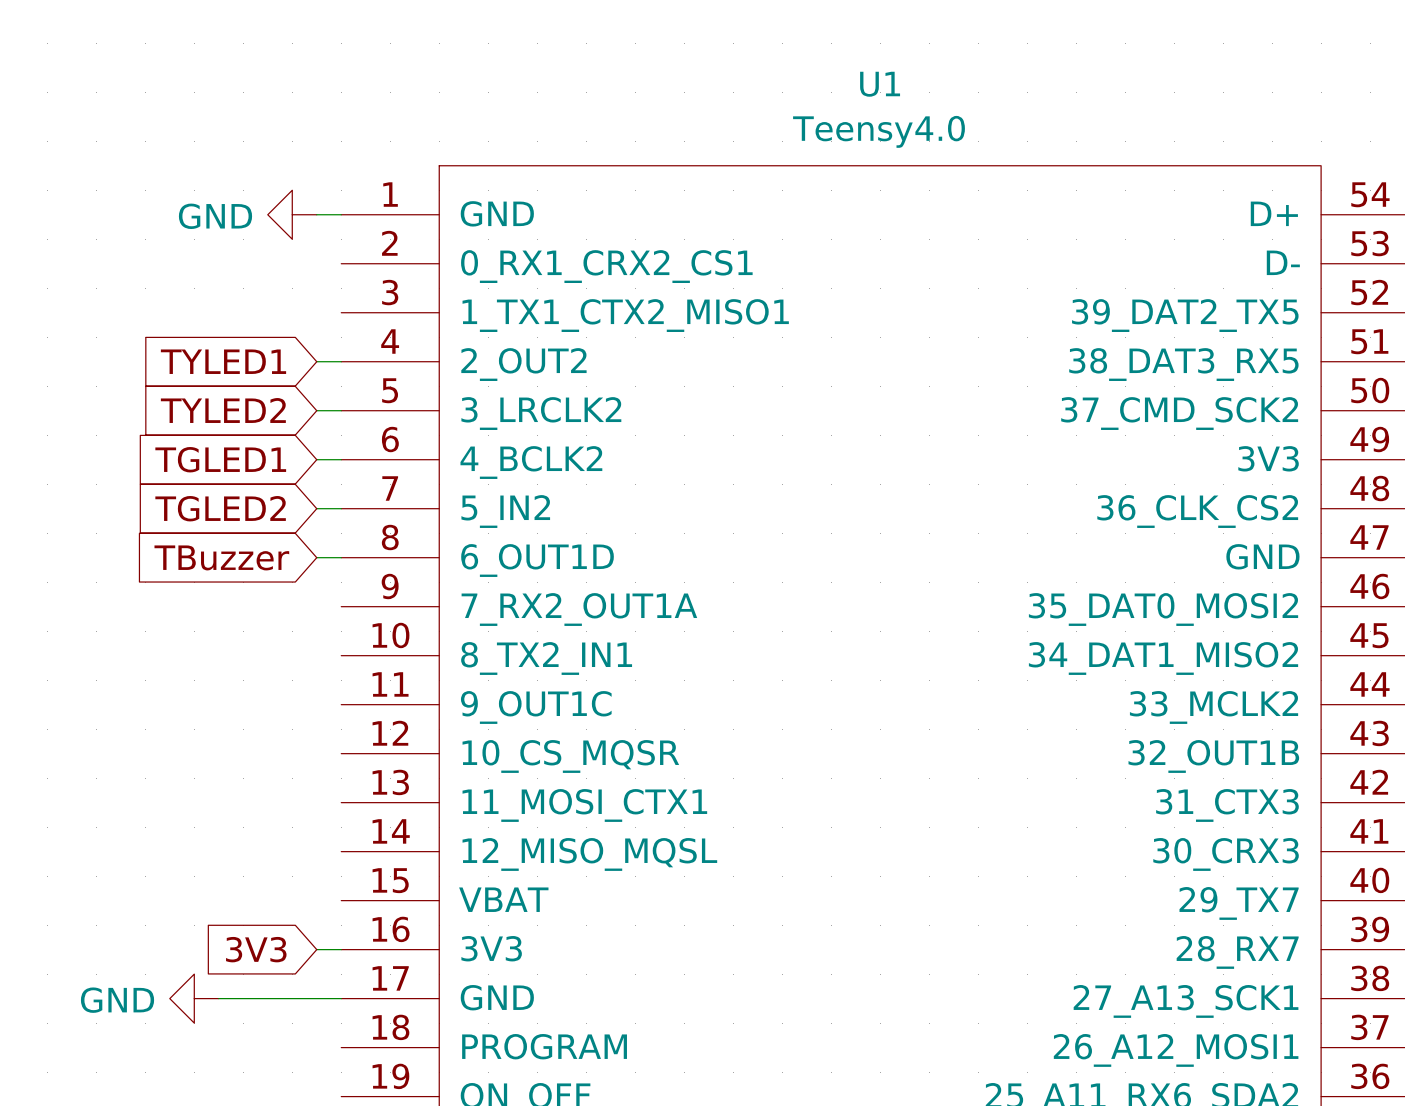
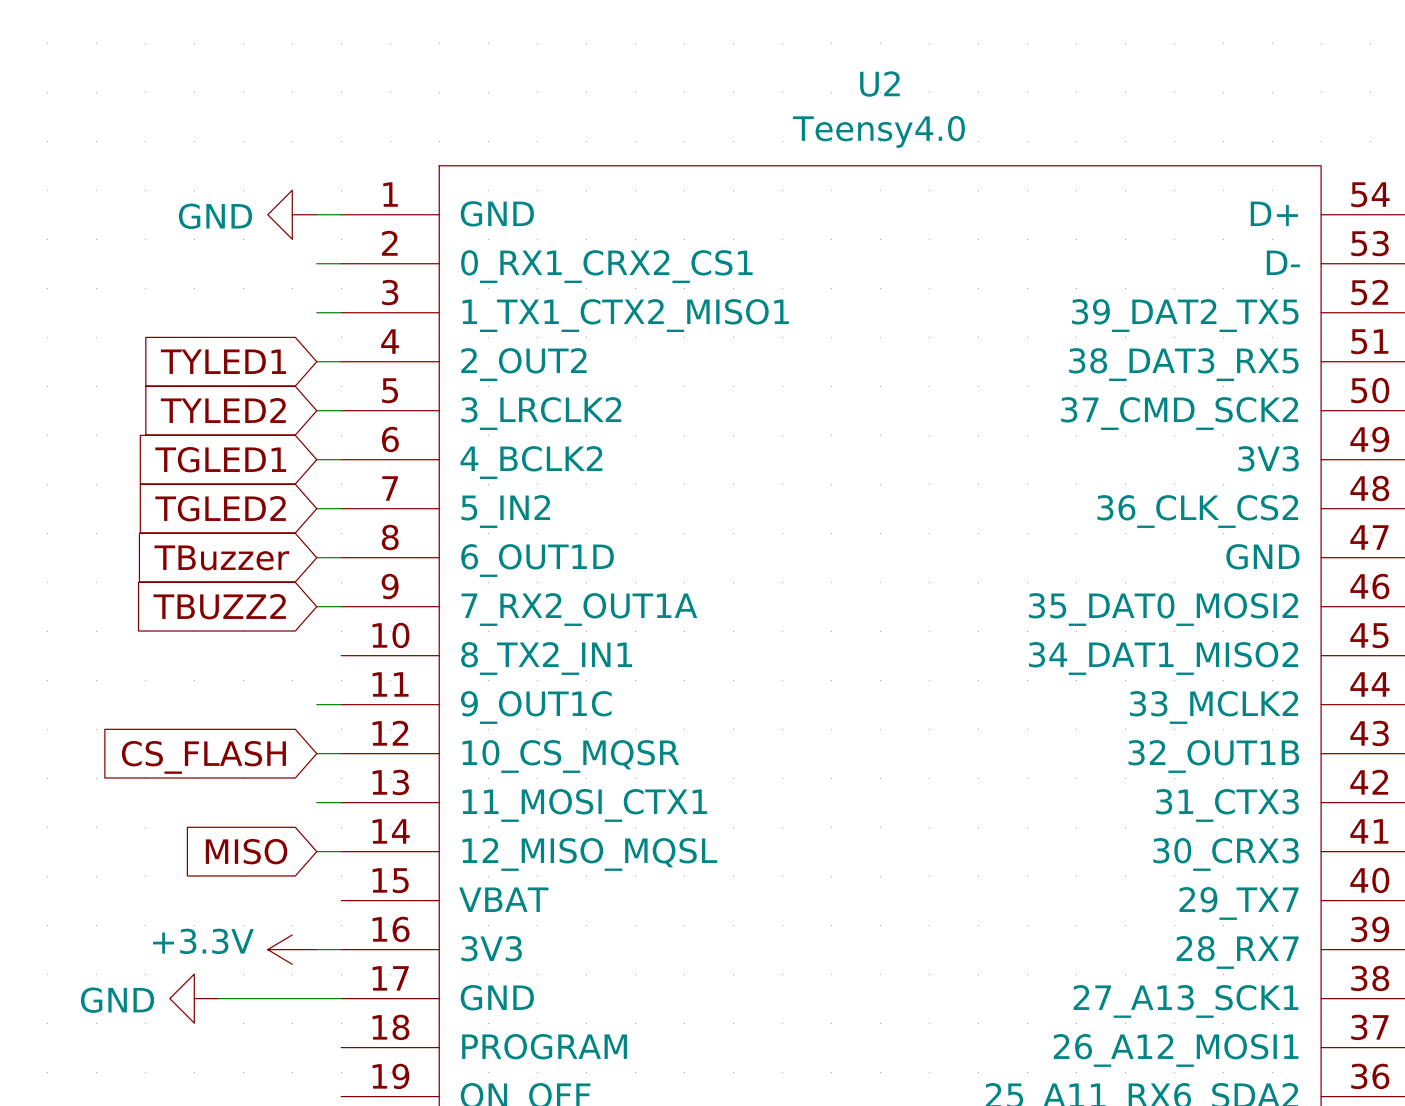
U1 name: U1 (880, 84) -> U2 (879, 84)
wire: none -> (316, 263) (341, 263)
wire: none -> (316, 312) (341, 312)
global label: none -> TBUZZ2 (219, 606)
wire: none -> (316, 606) (341, 606)
wire: none -> (316, 704) (341, 704)
wire: none -> (316, 753) (341, 753)
global label: none -> CS_FLASH (203, 757)
wire: none -> (316, 802) (341, 802)
global label: none -> MISO (246, 851)
wire: none -> (316, 851) (341, 851)
global label: 3V3 (256, 949) -> none
power symbol: none -> +3.3V (292, 949)

